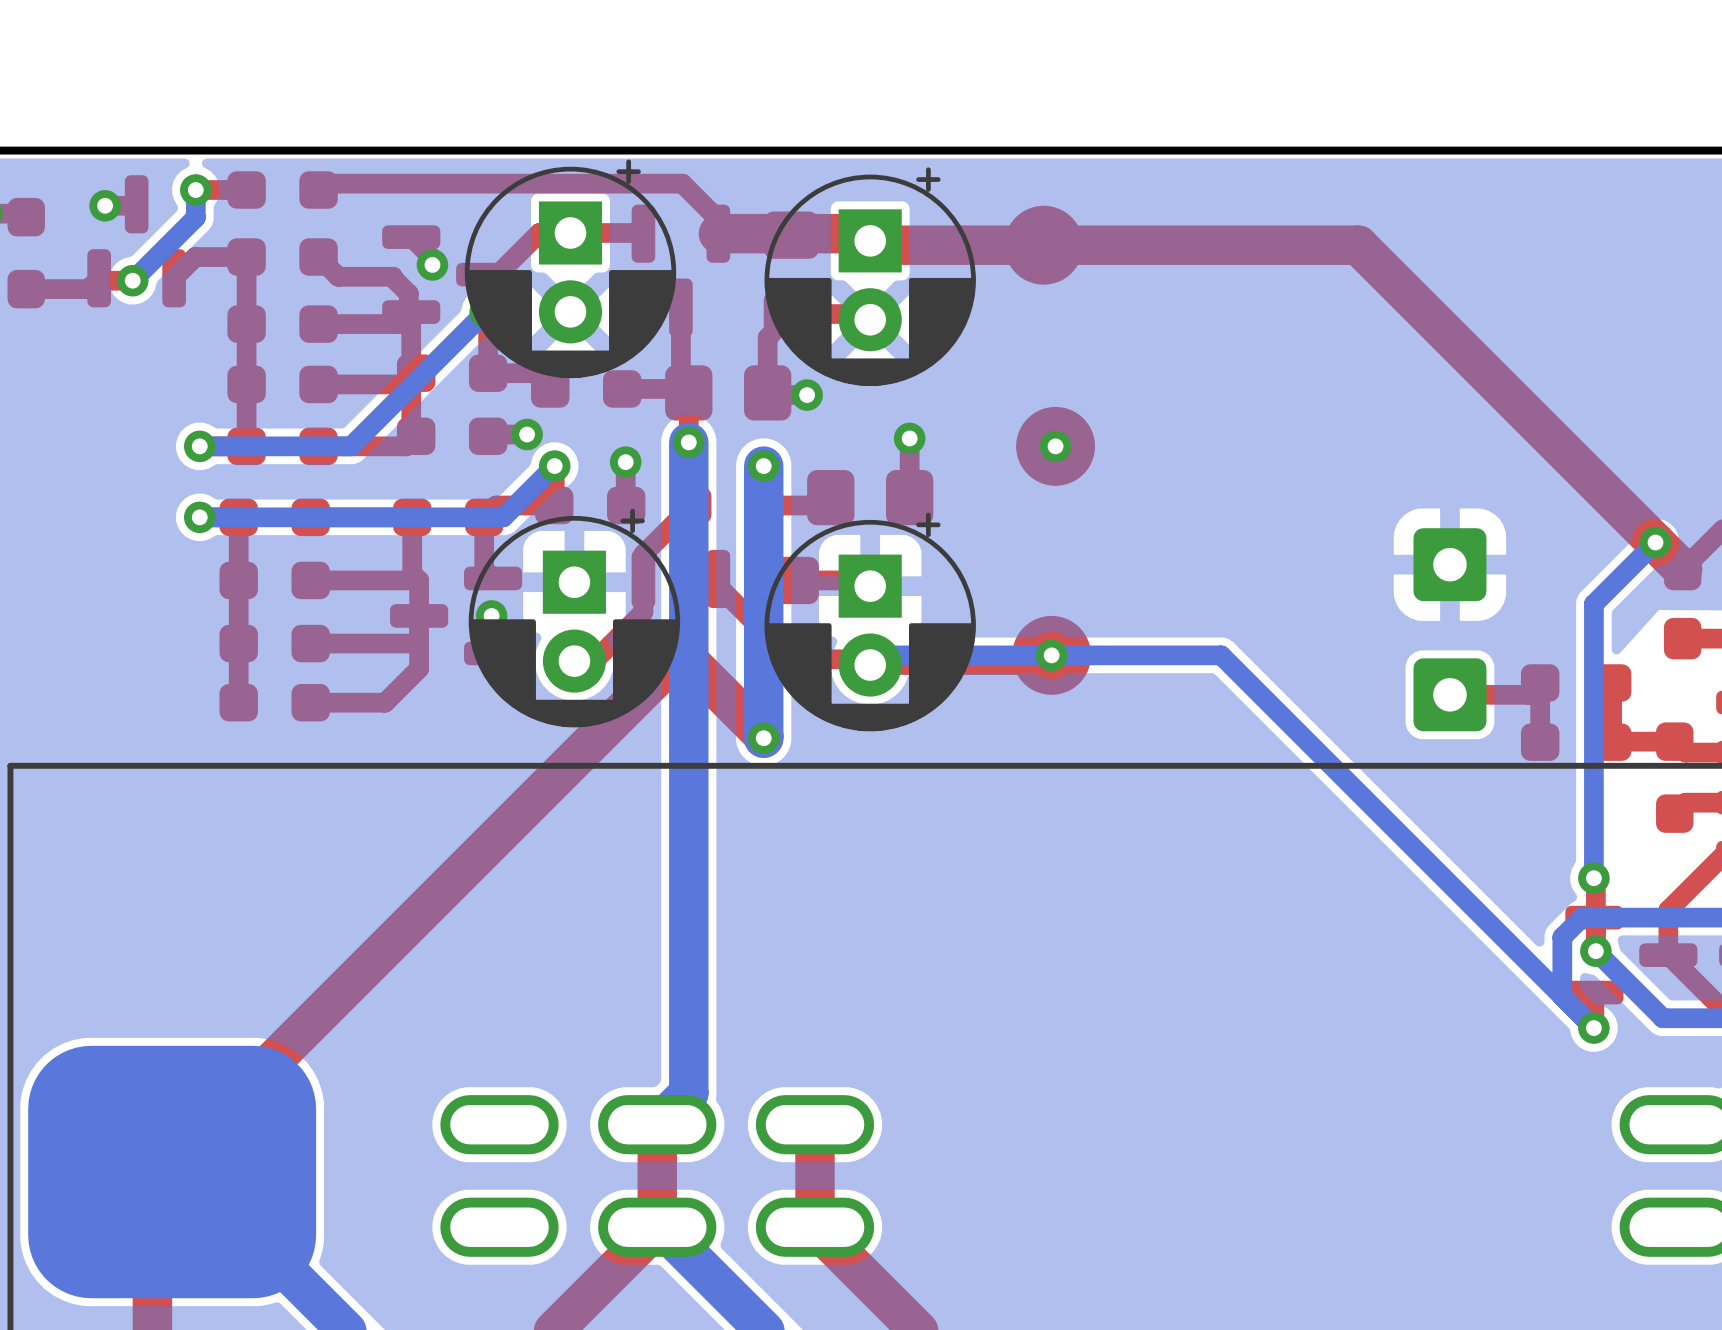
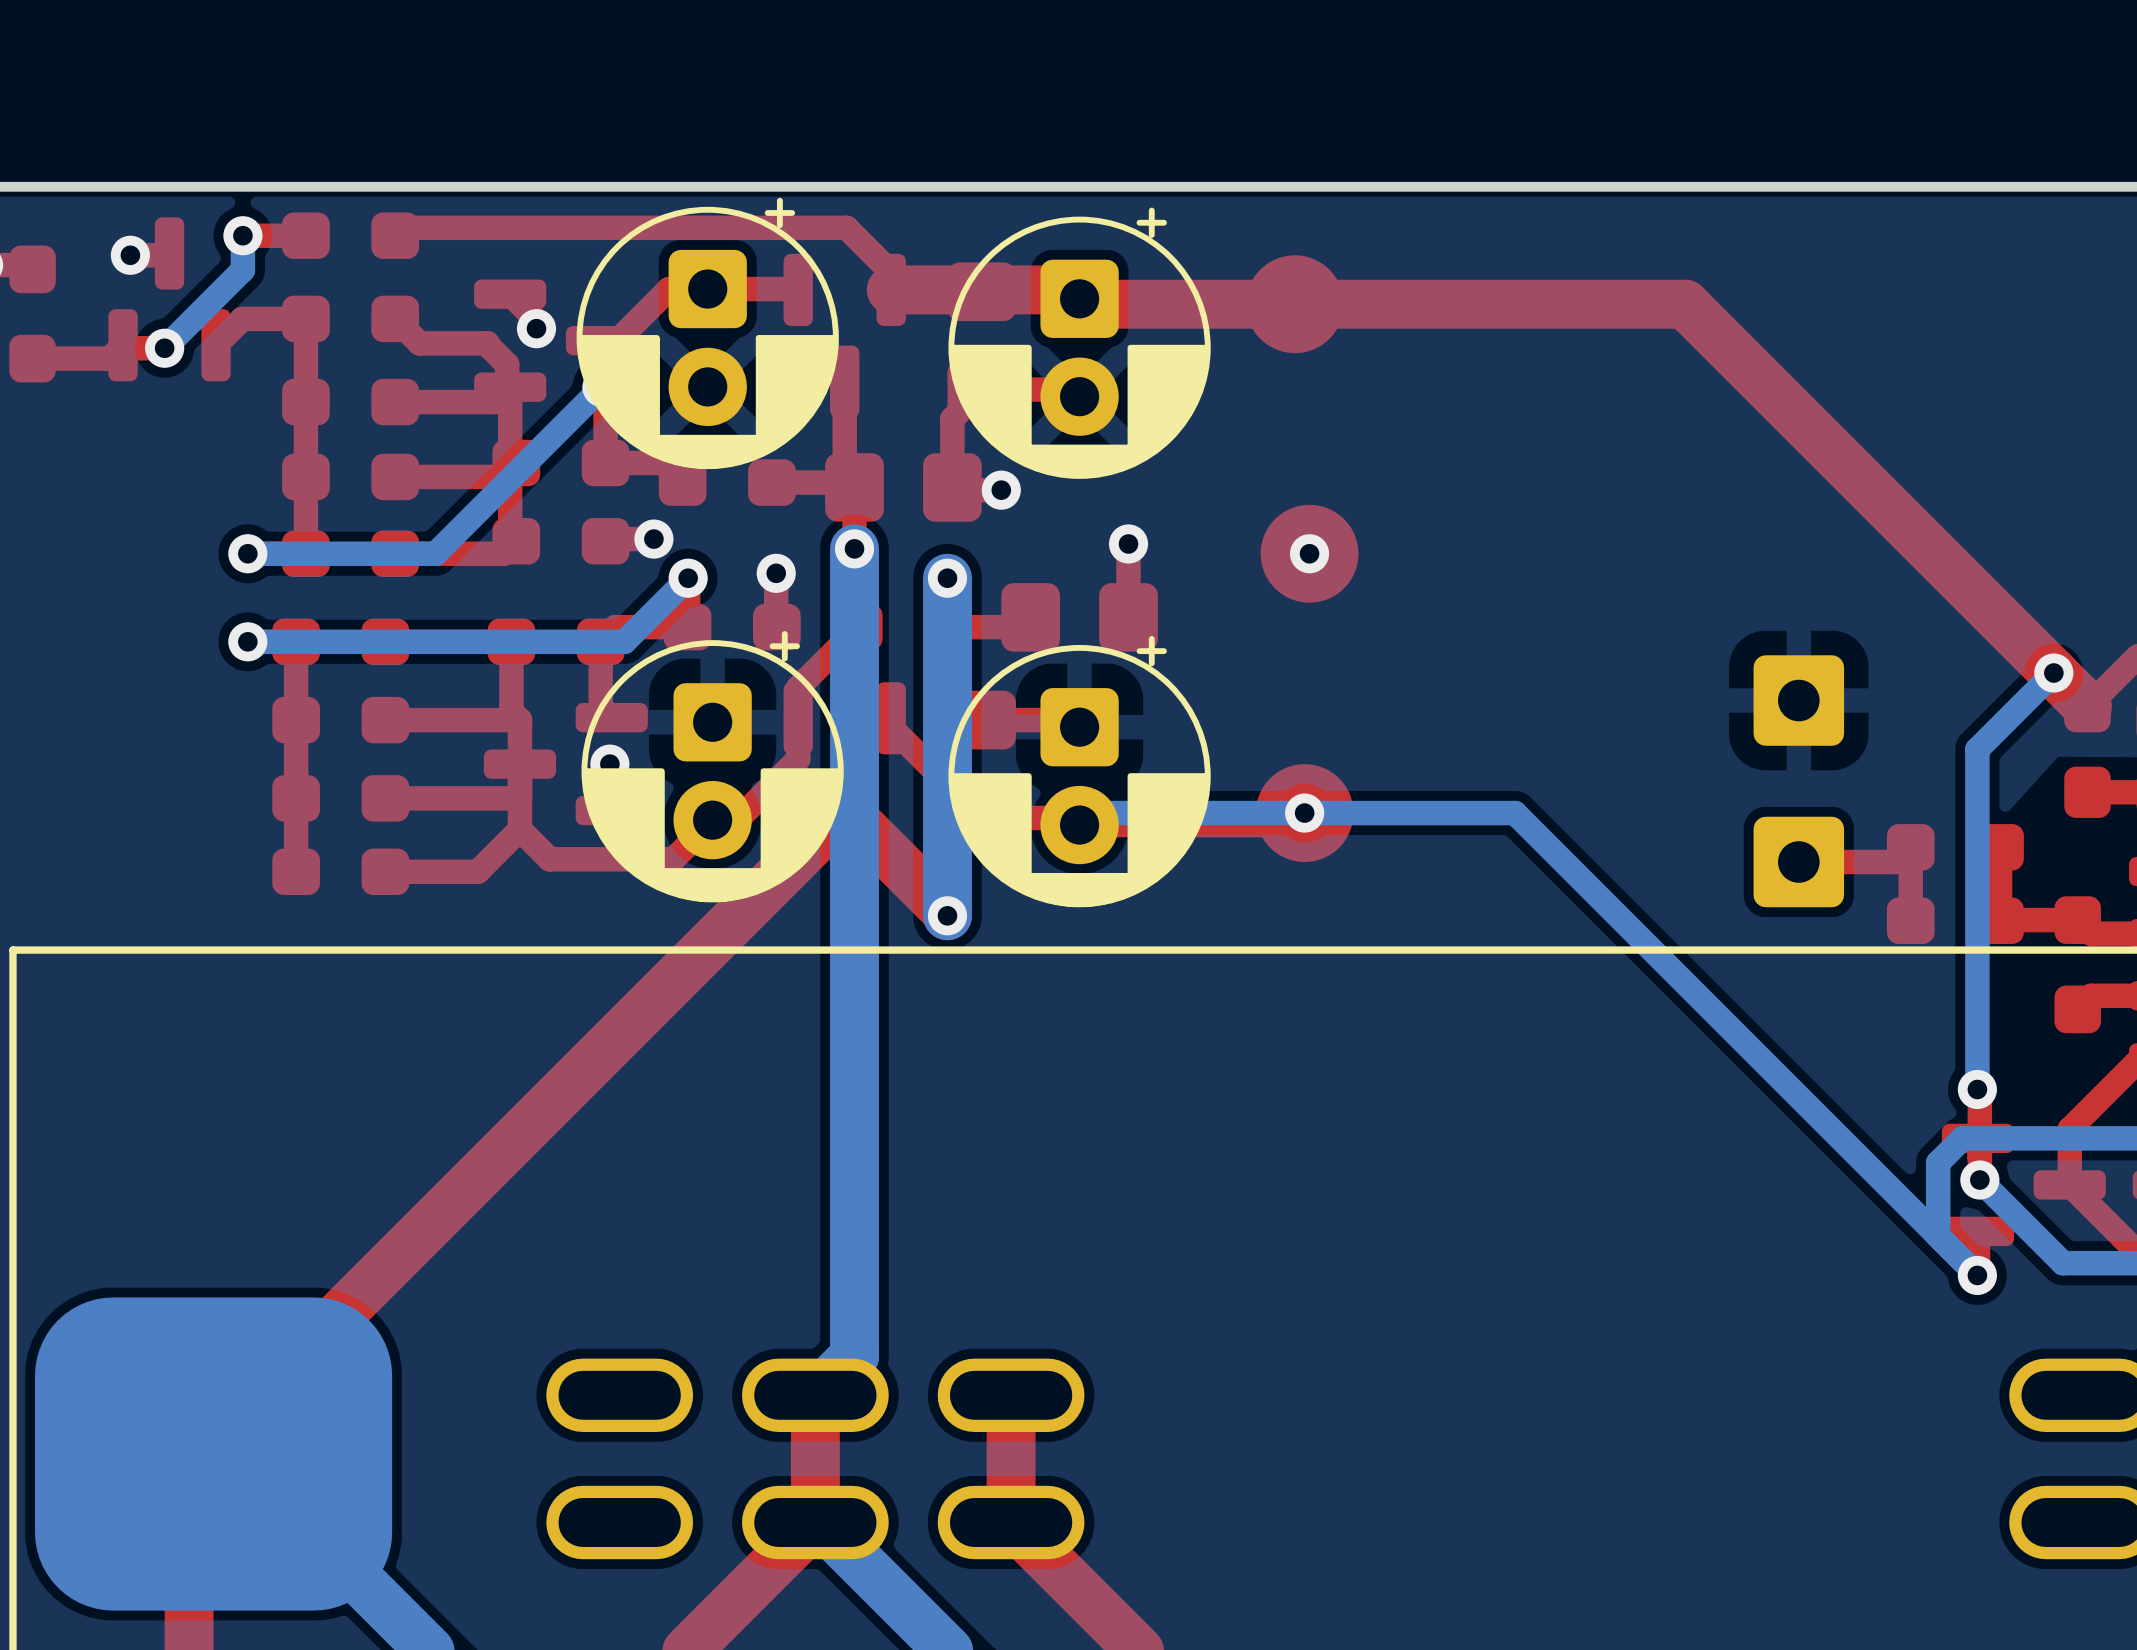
part footprint: [464, 159, 677, 379] -> [576, 197, 839, 470]
part footprint: [764, 167, 976, 387] -> [948, 207, 1211, 479]
part footprint: [468, 508, 681, 728] -> [581, 631, 844, 903]
part footprint: [764, 512, 976, 732] -> [948, 635, 1211, 908]
top track: none -> (712, 820) (673, 859) (549, 859) (519, 829)

